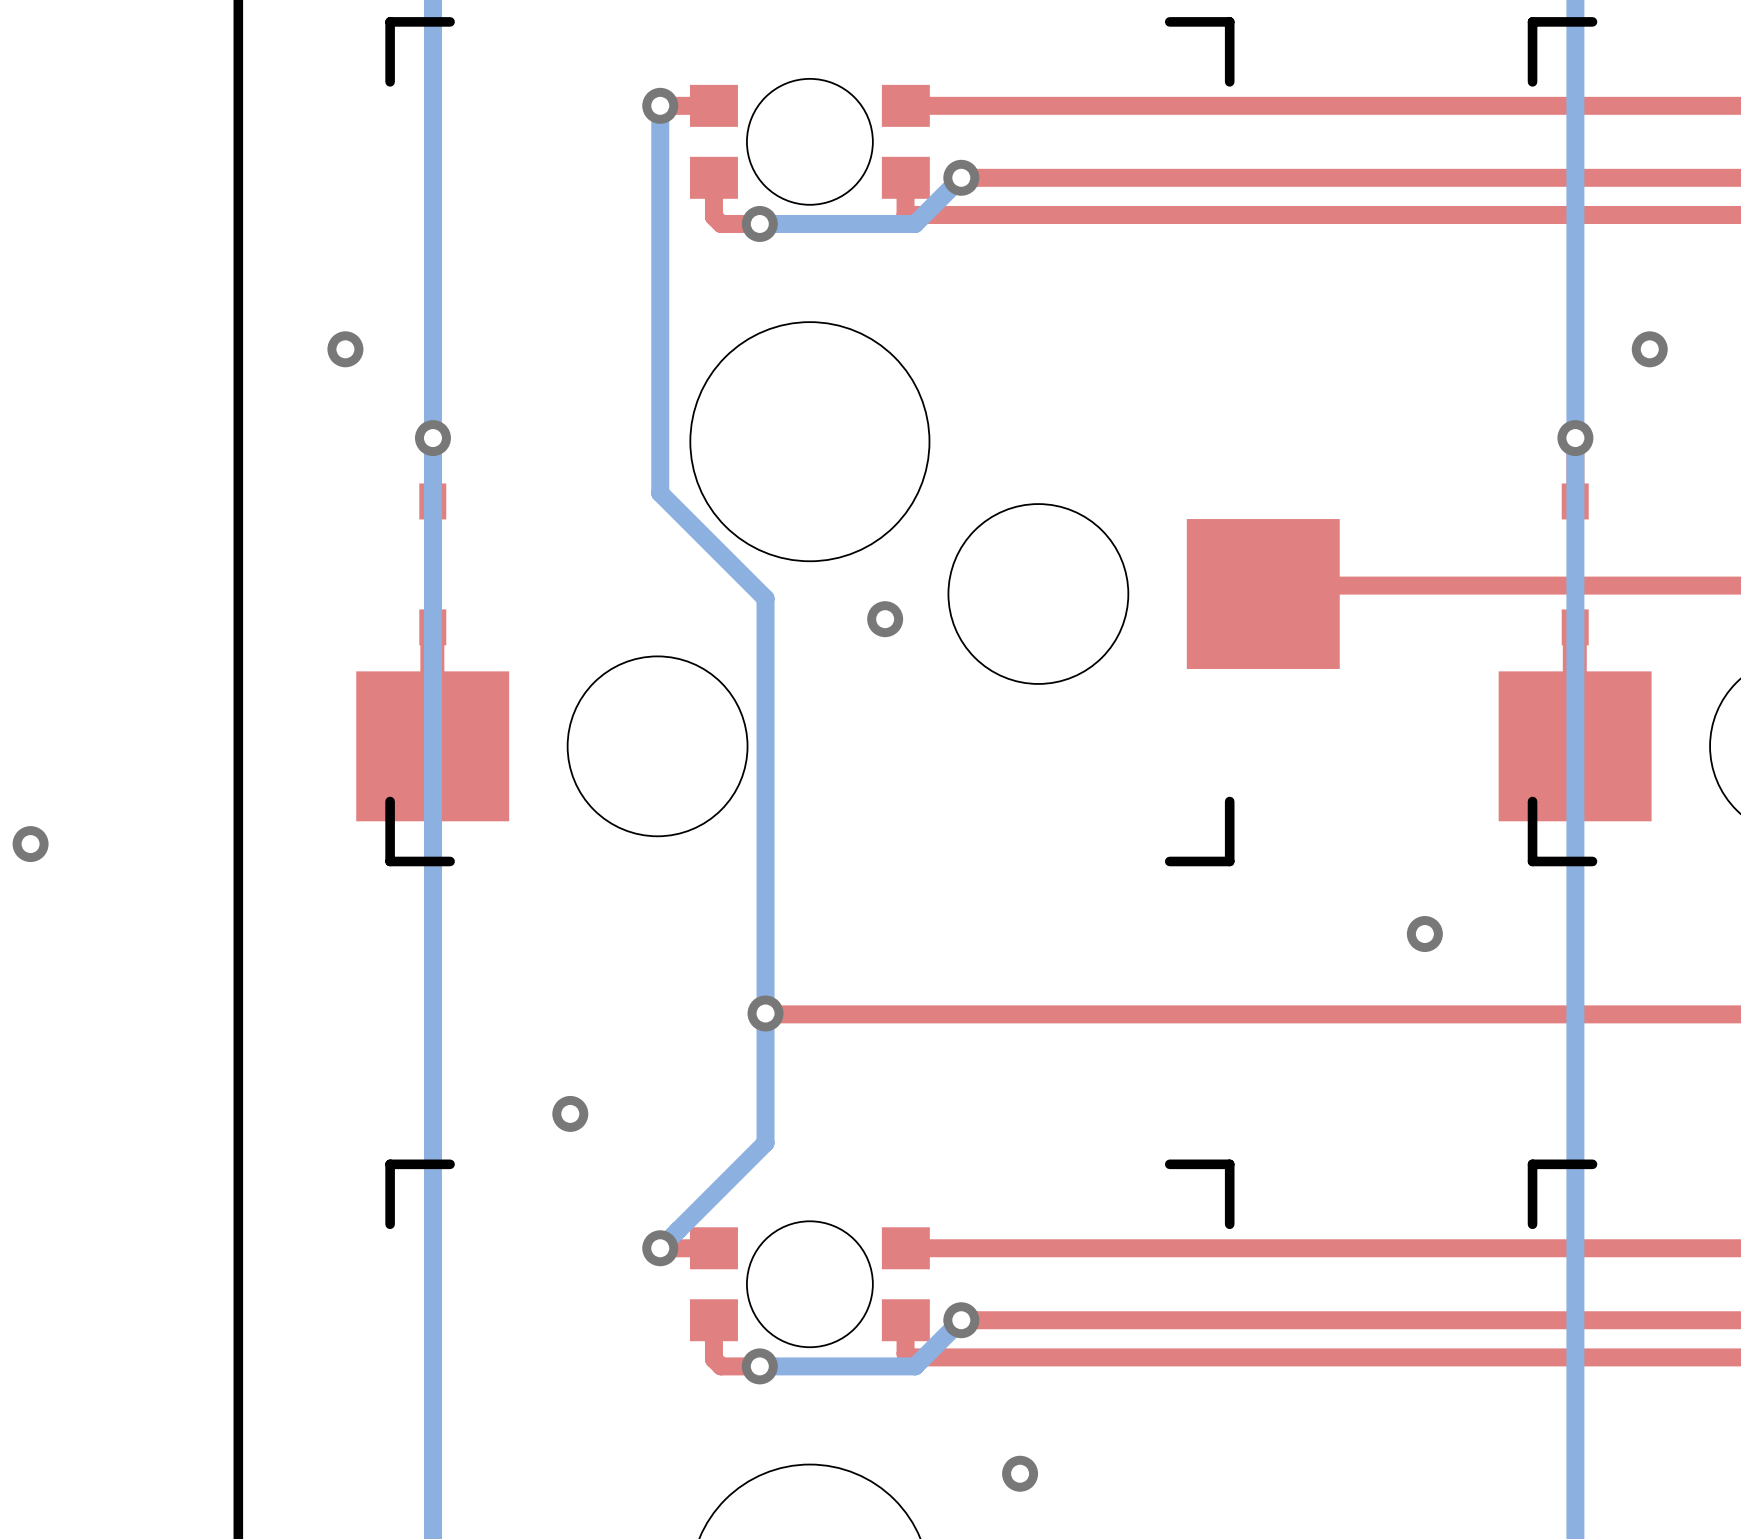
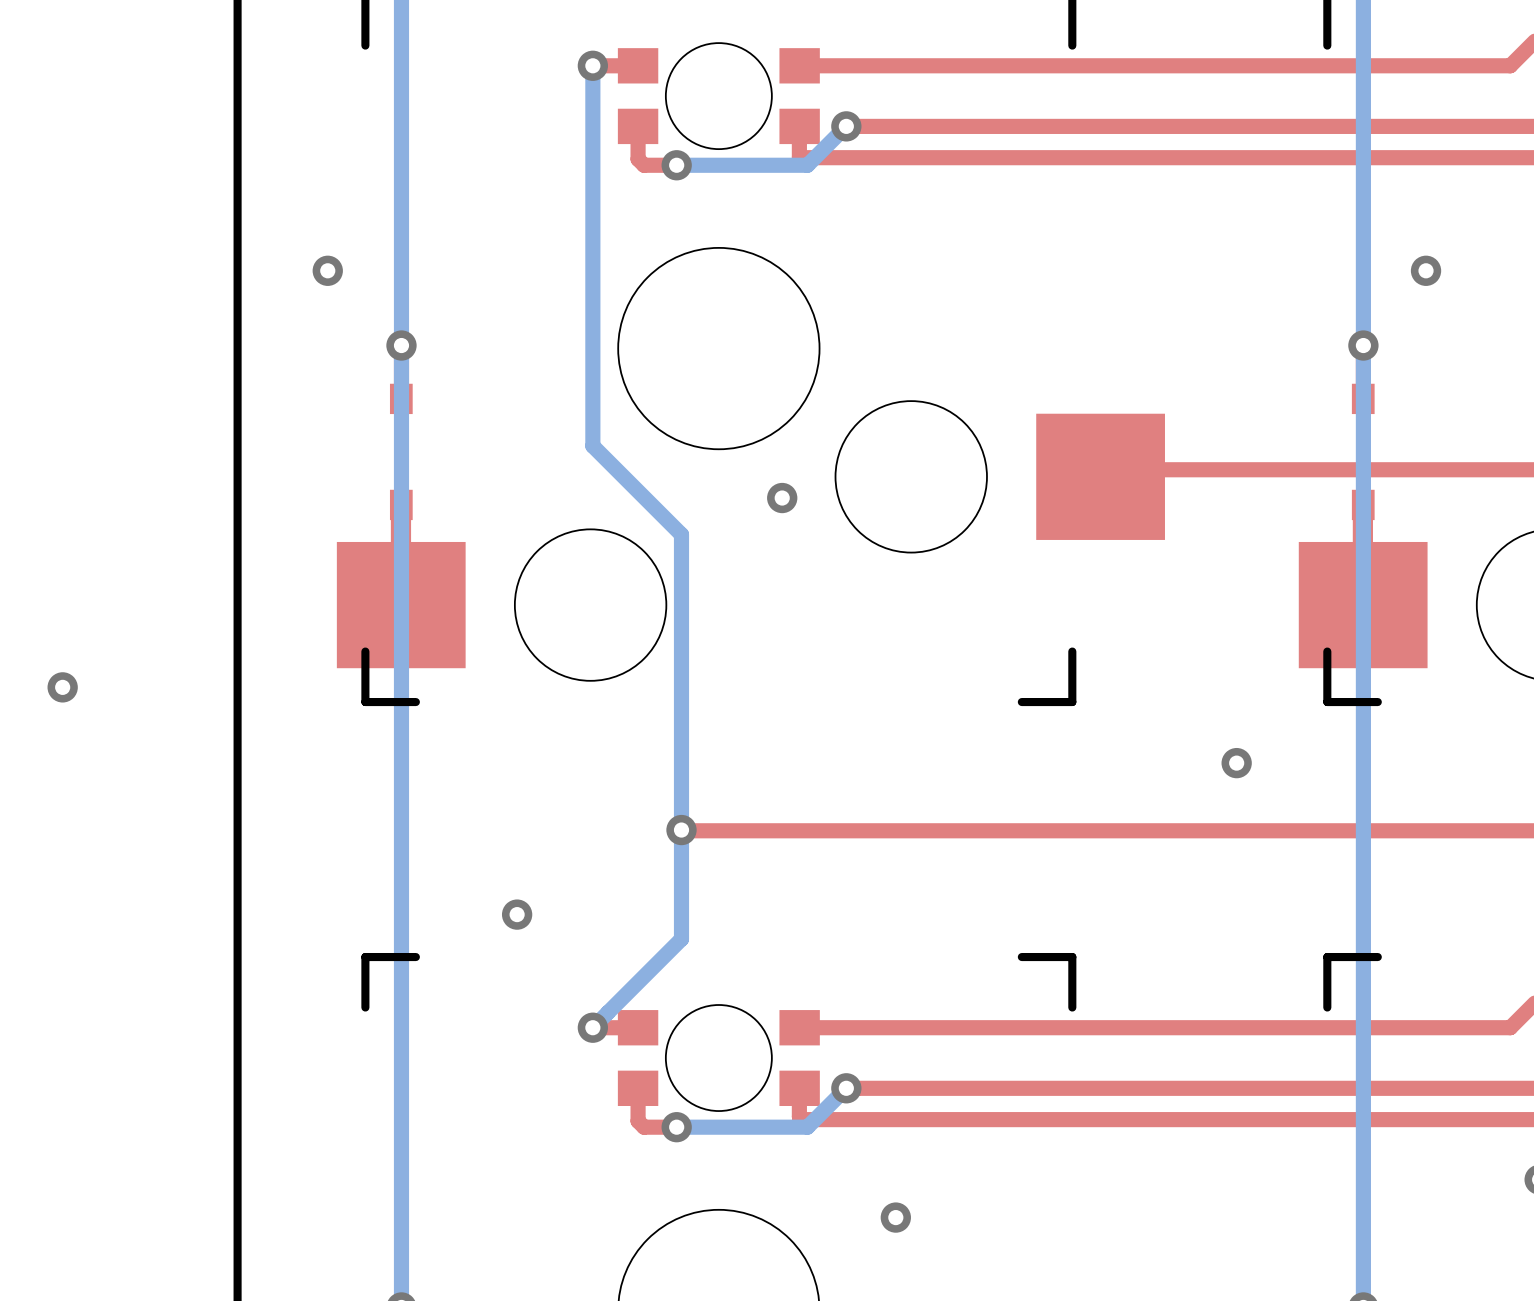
bottom track: (660, 493) (765, 598) (765, 662) -> (592, 391) (592, 446) (681, 534)

